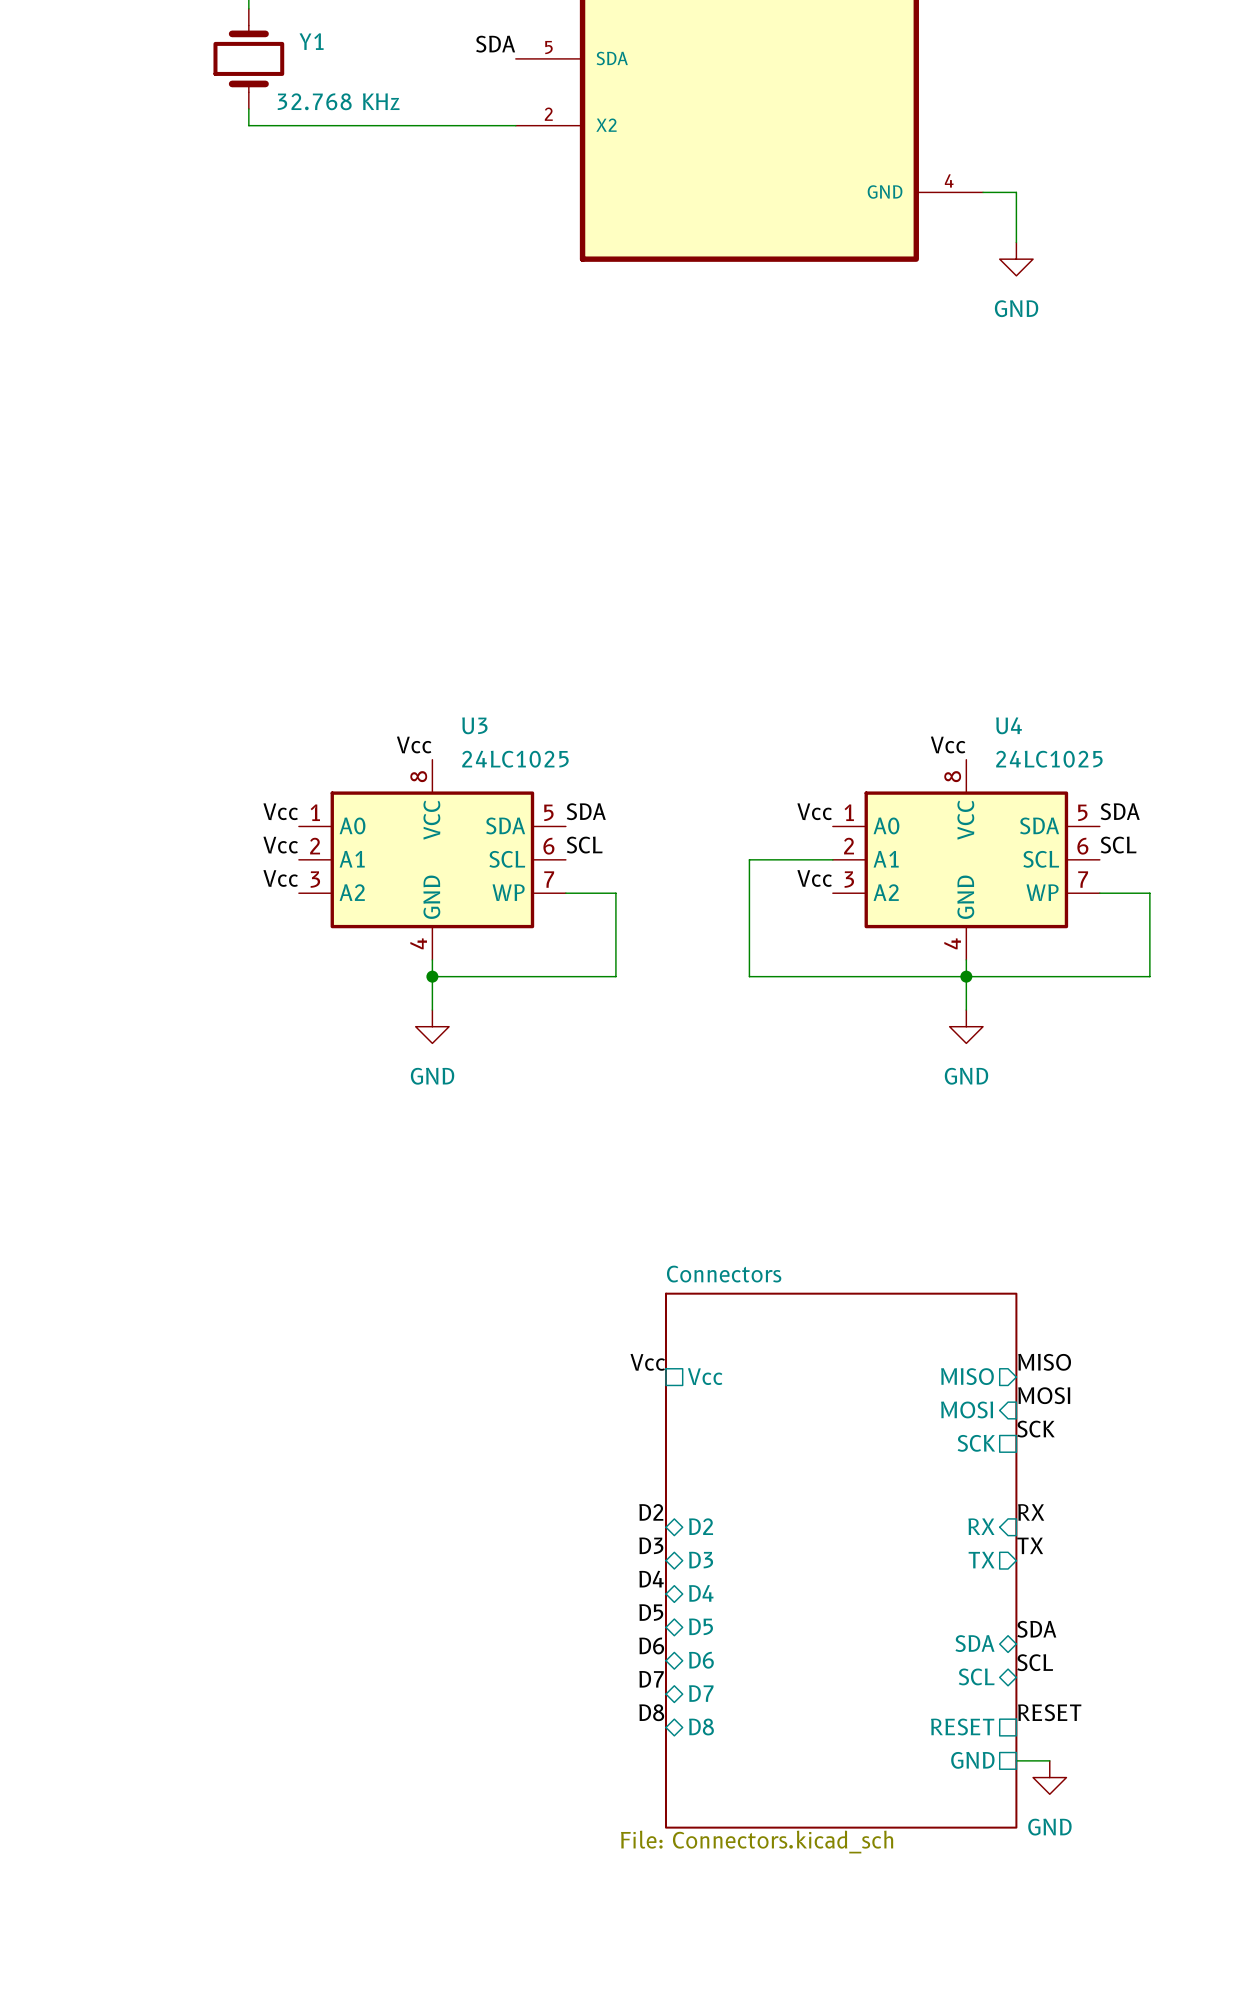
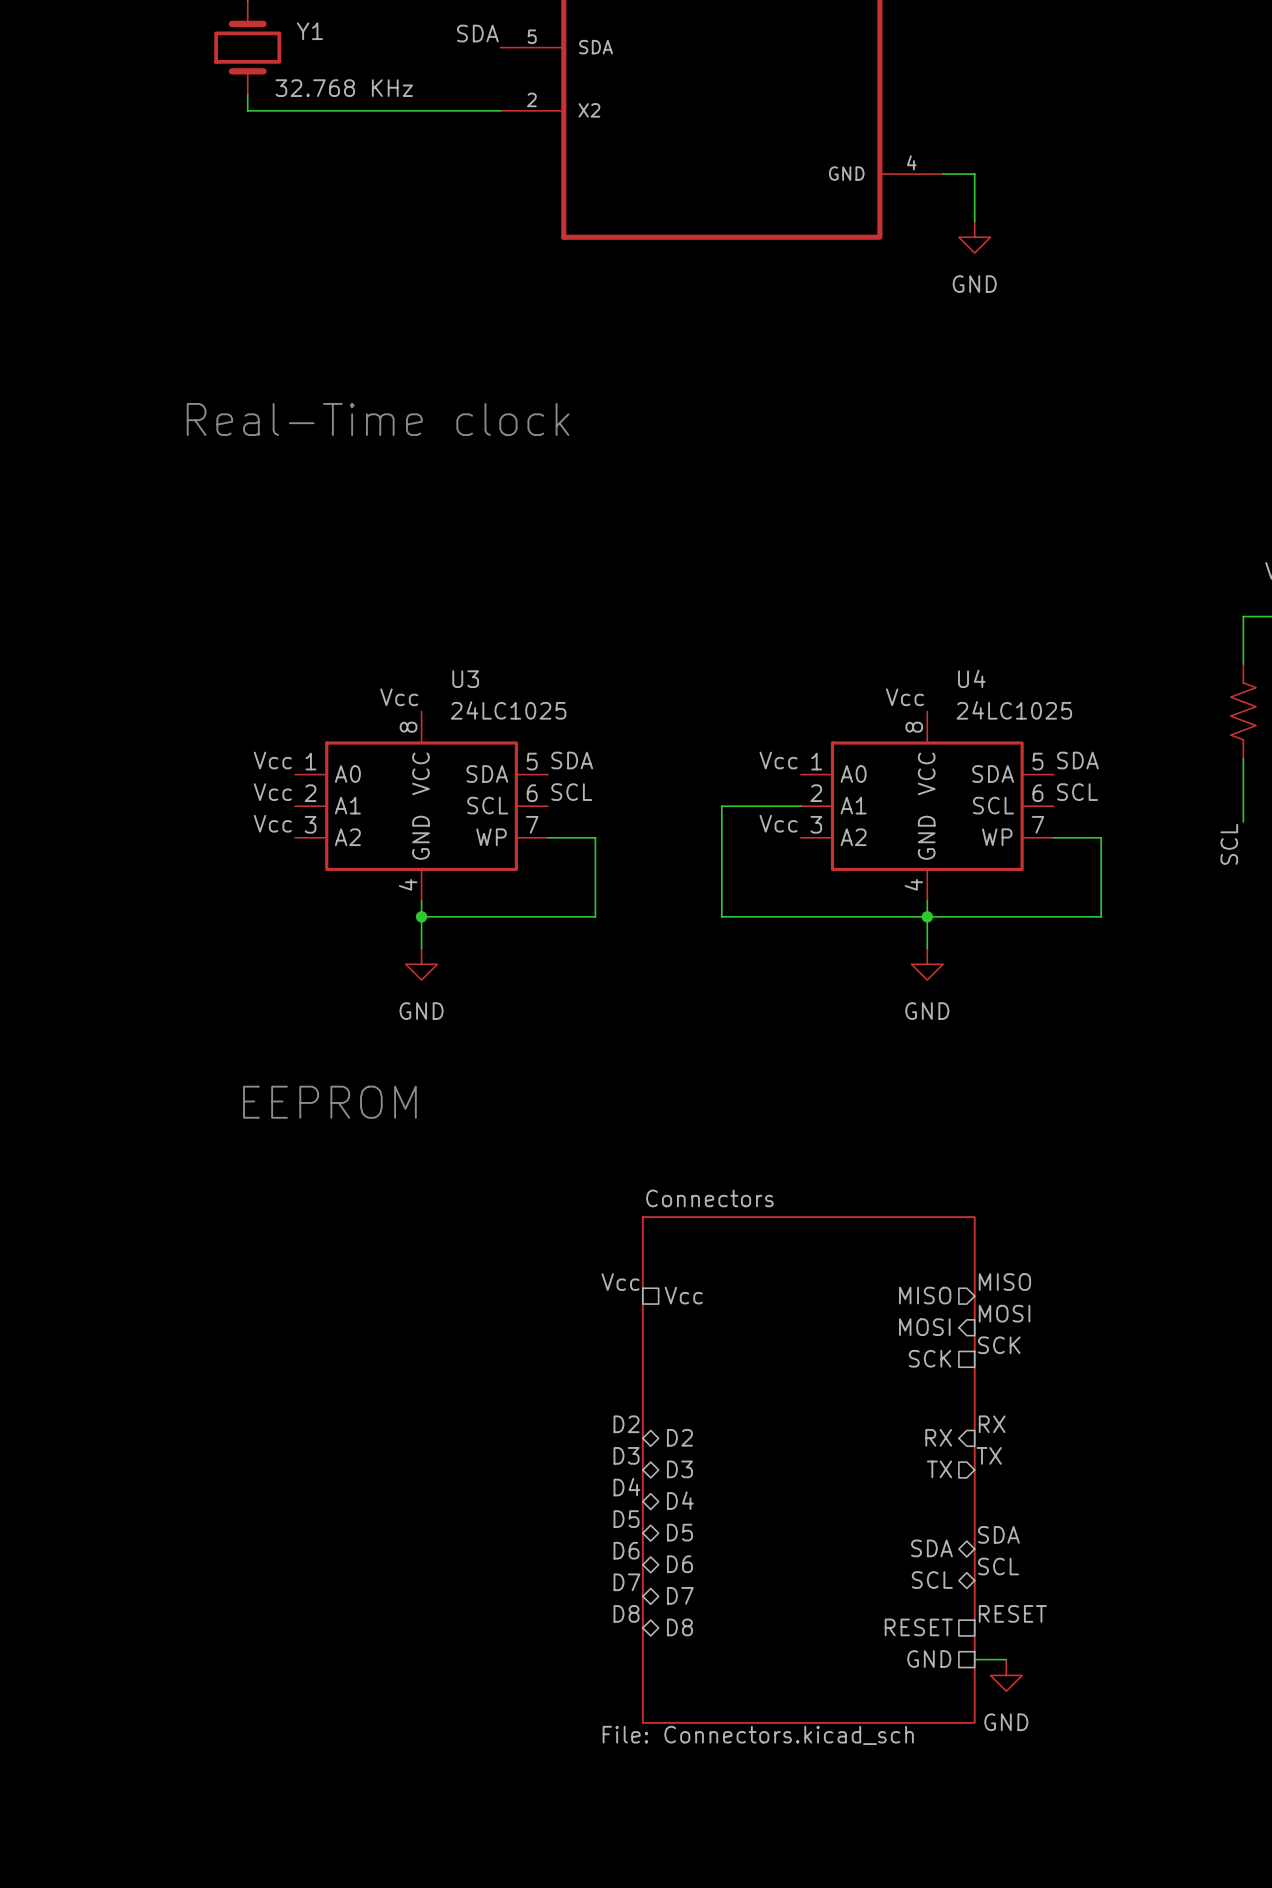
text: none -> Real-Time clock (378, 419)
text: none -> EEPROM (329, 1102)

